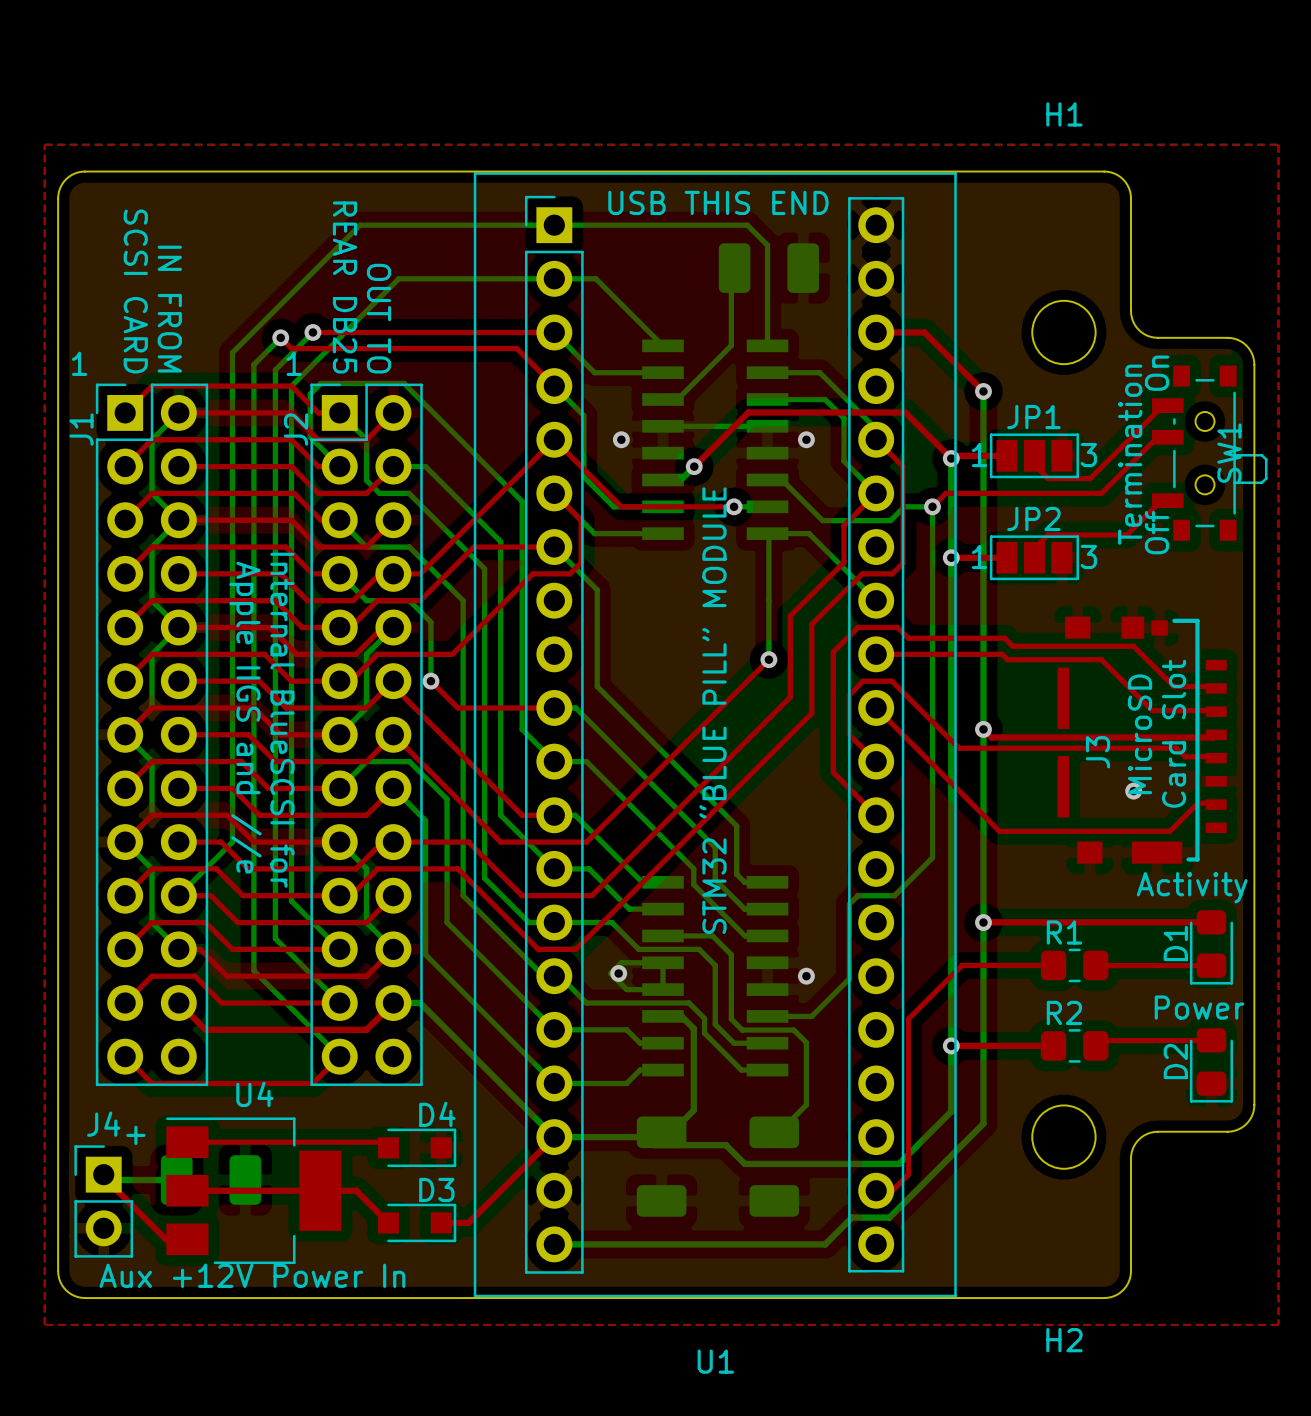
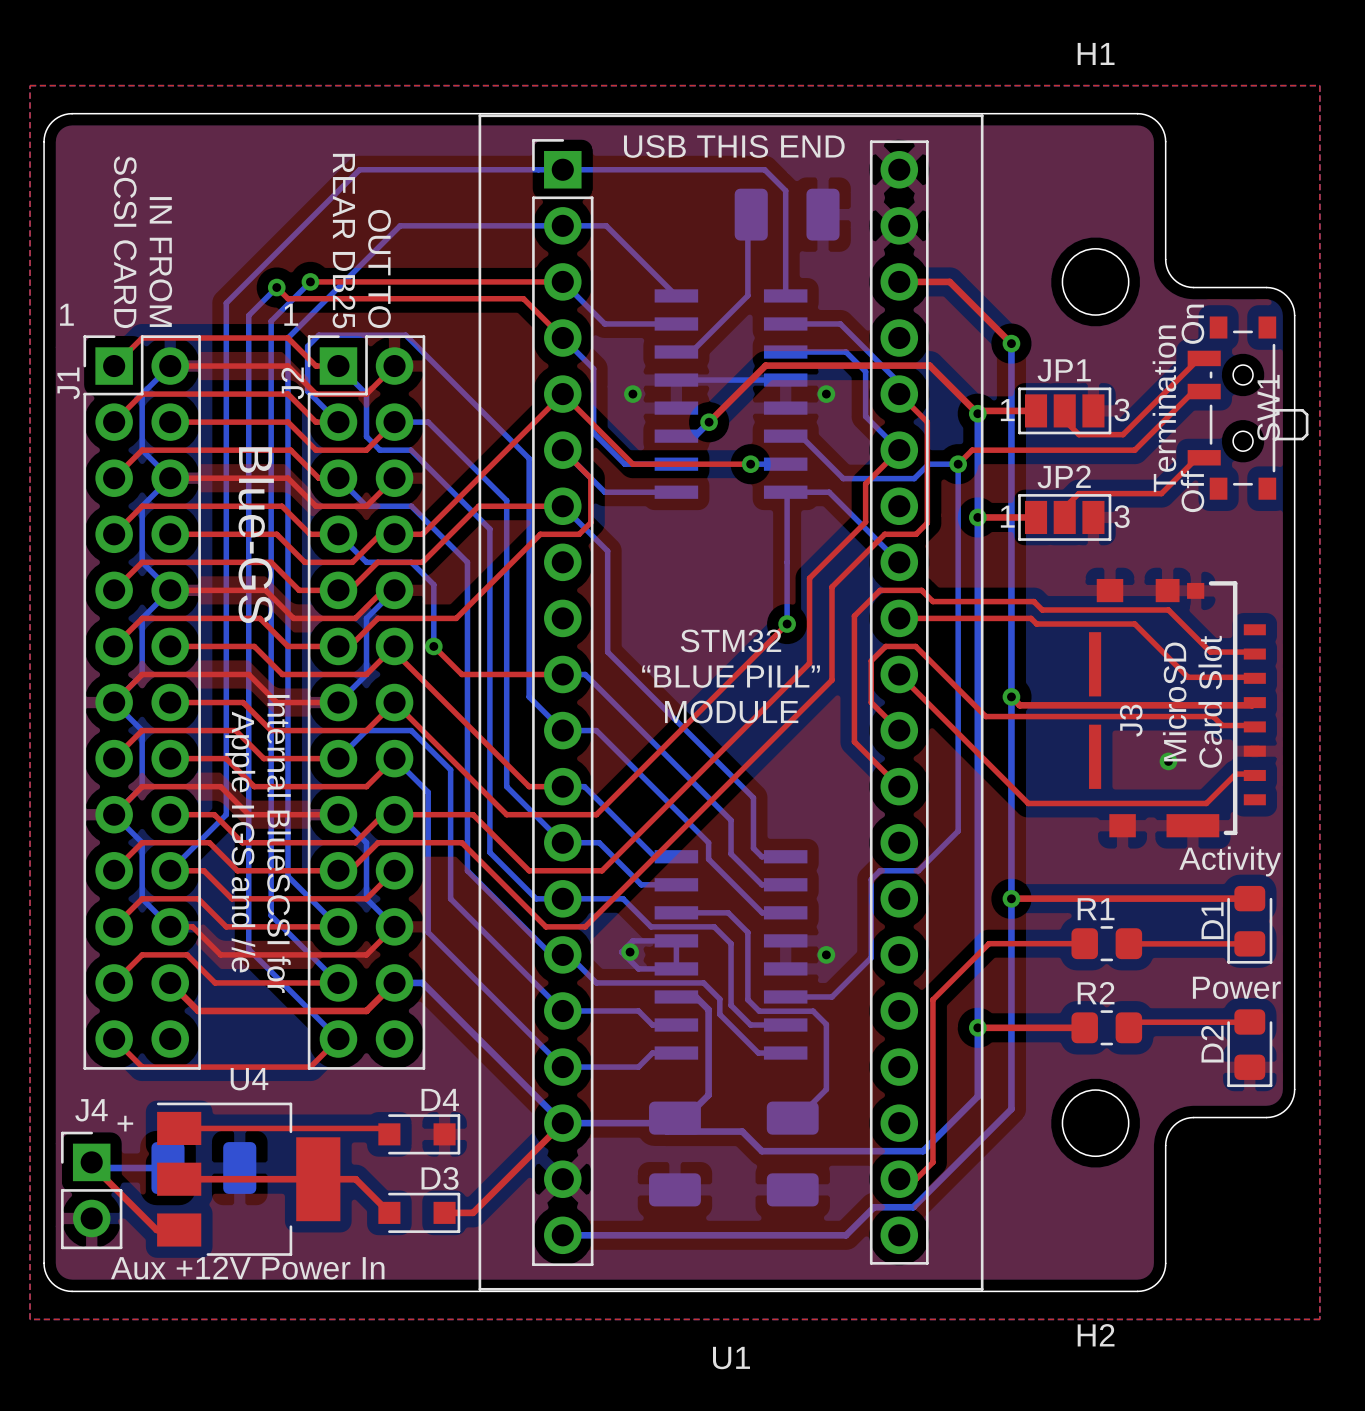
text: none -> Blue-GS (256, 535)
text: none -> STM32 (730, 640)
text: STM32 “BLUE PILL” MODULE (712, 710) -> “BLUE PILL” (731, 676)
text position: Apple IIGS and //e (245, 717) -> Apple IIGS and //e (240, 842)
text position: Internal BlueSCSI for (282, 720) -> Internal BlueSCSI for (278, 843)
text: none -> MODULE (731, 712)

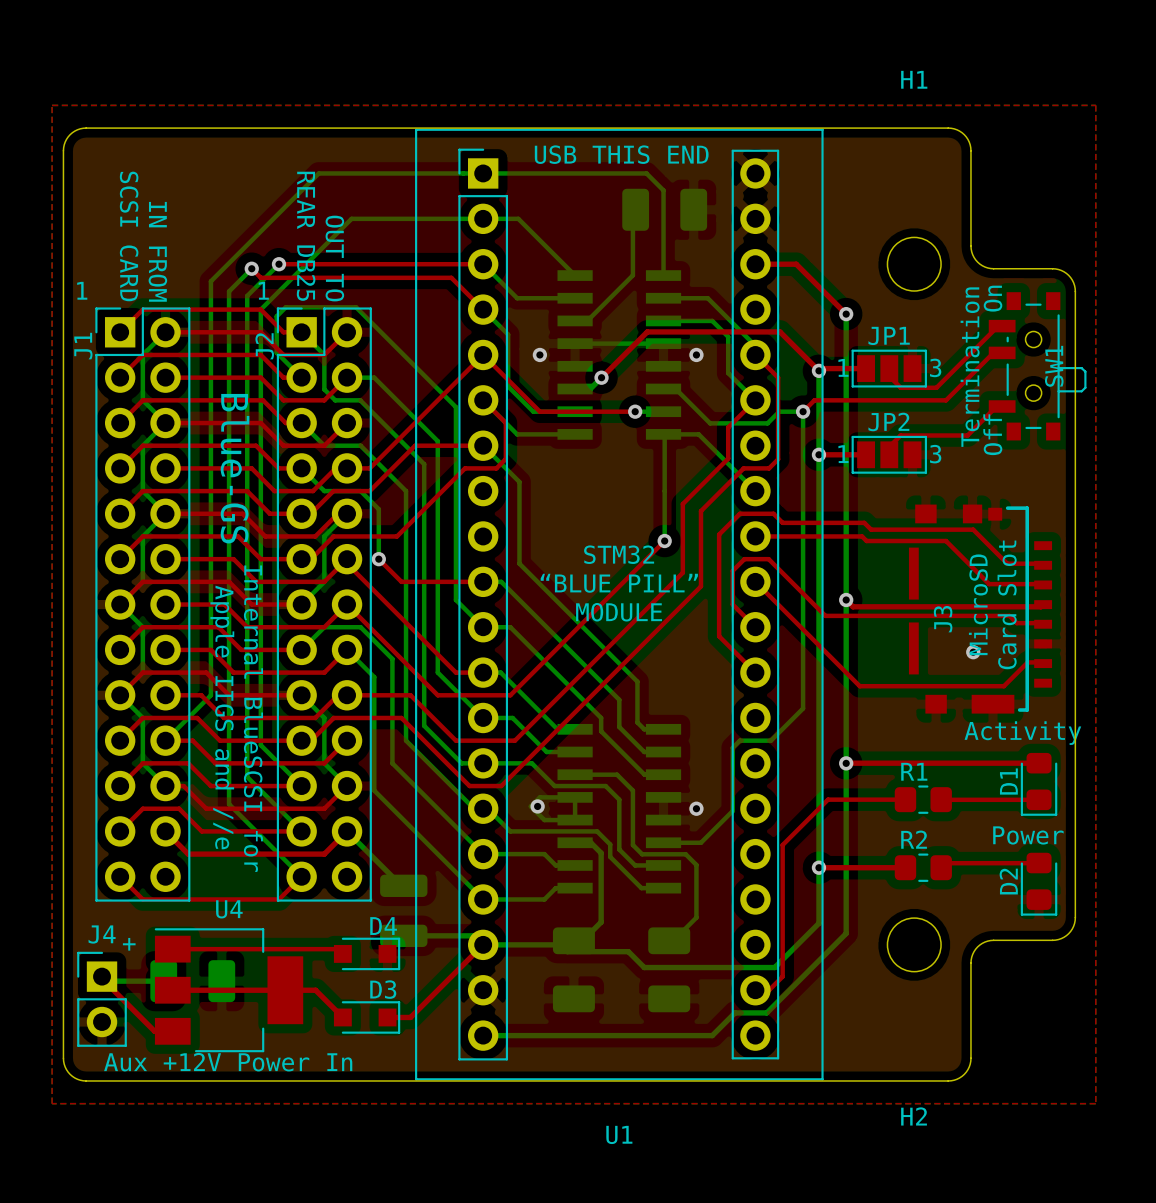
bottom track: (394, 982) (422, 982) (551, 1112) -> (347, 831) (401, 885) (403, 885)
part: none -> (403, 910)
bottom track: none -> (403, 935) (474, 935)

